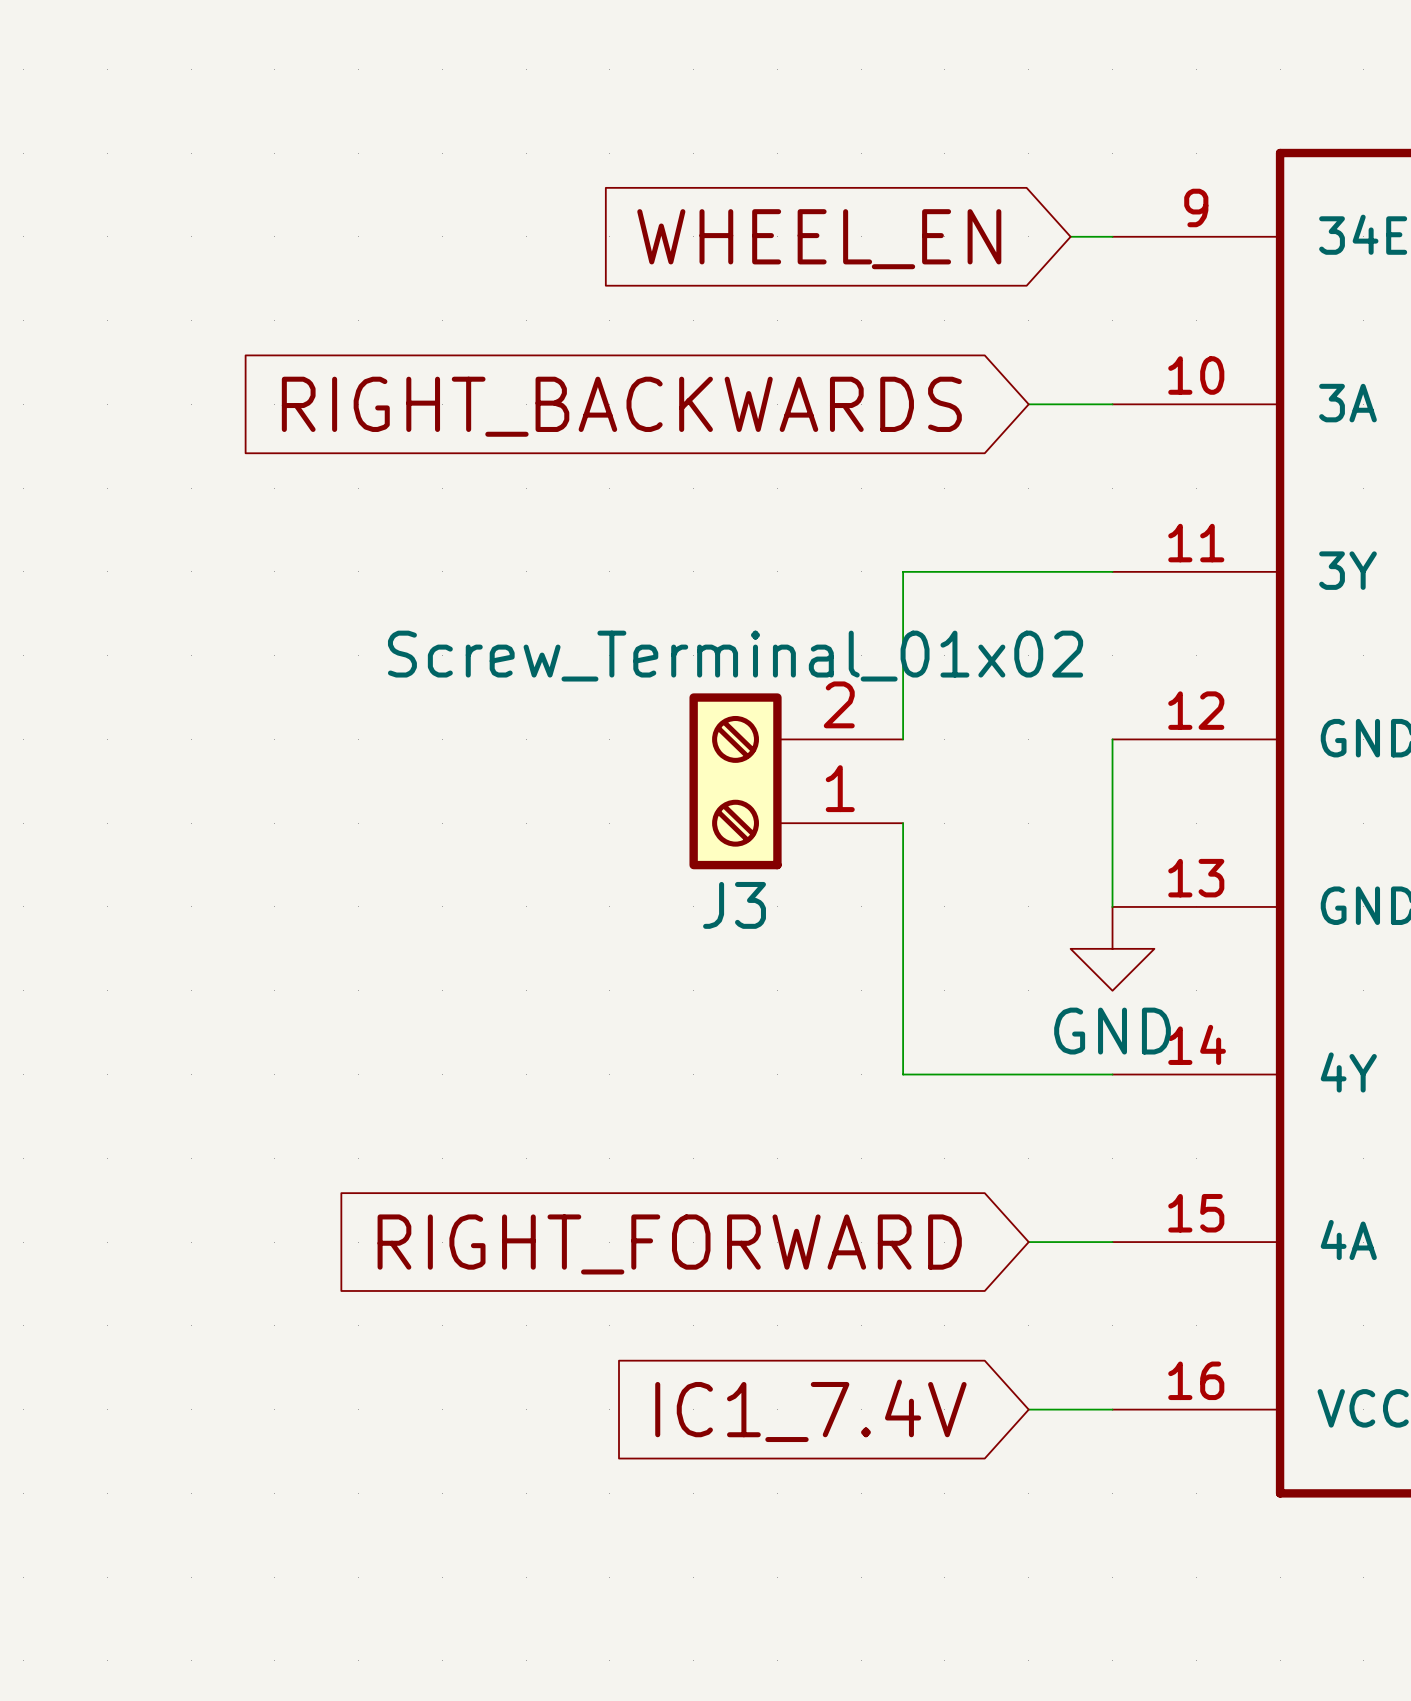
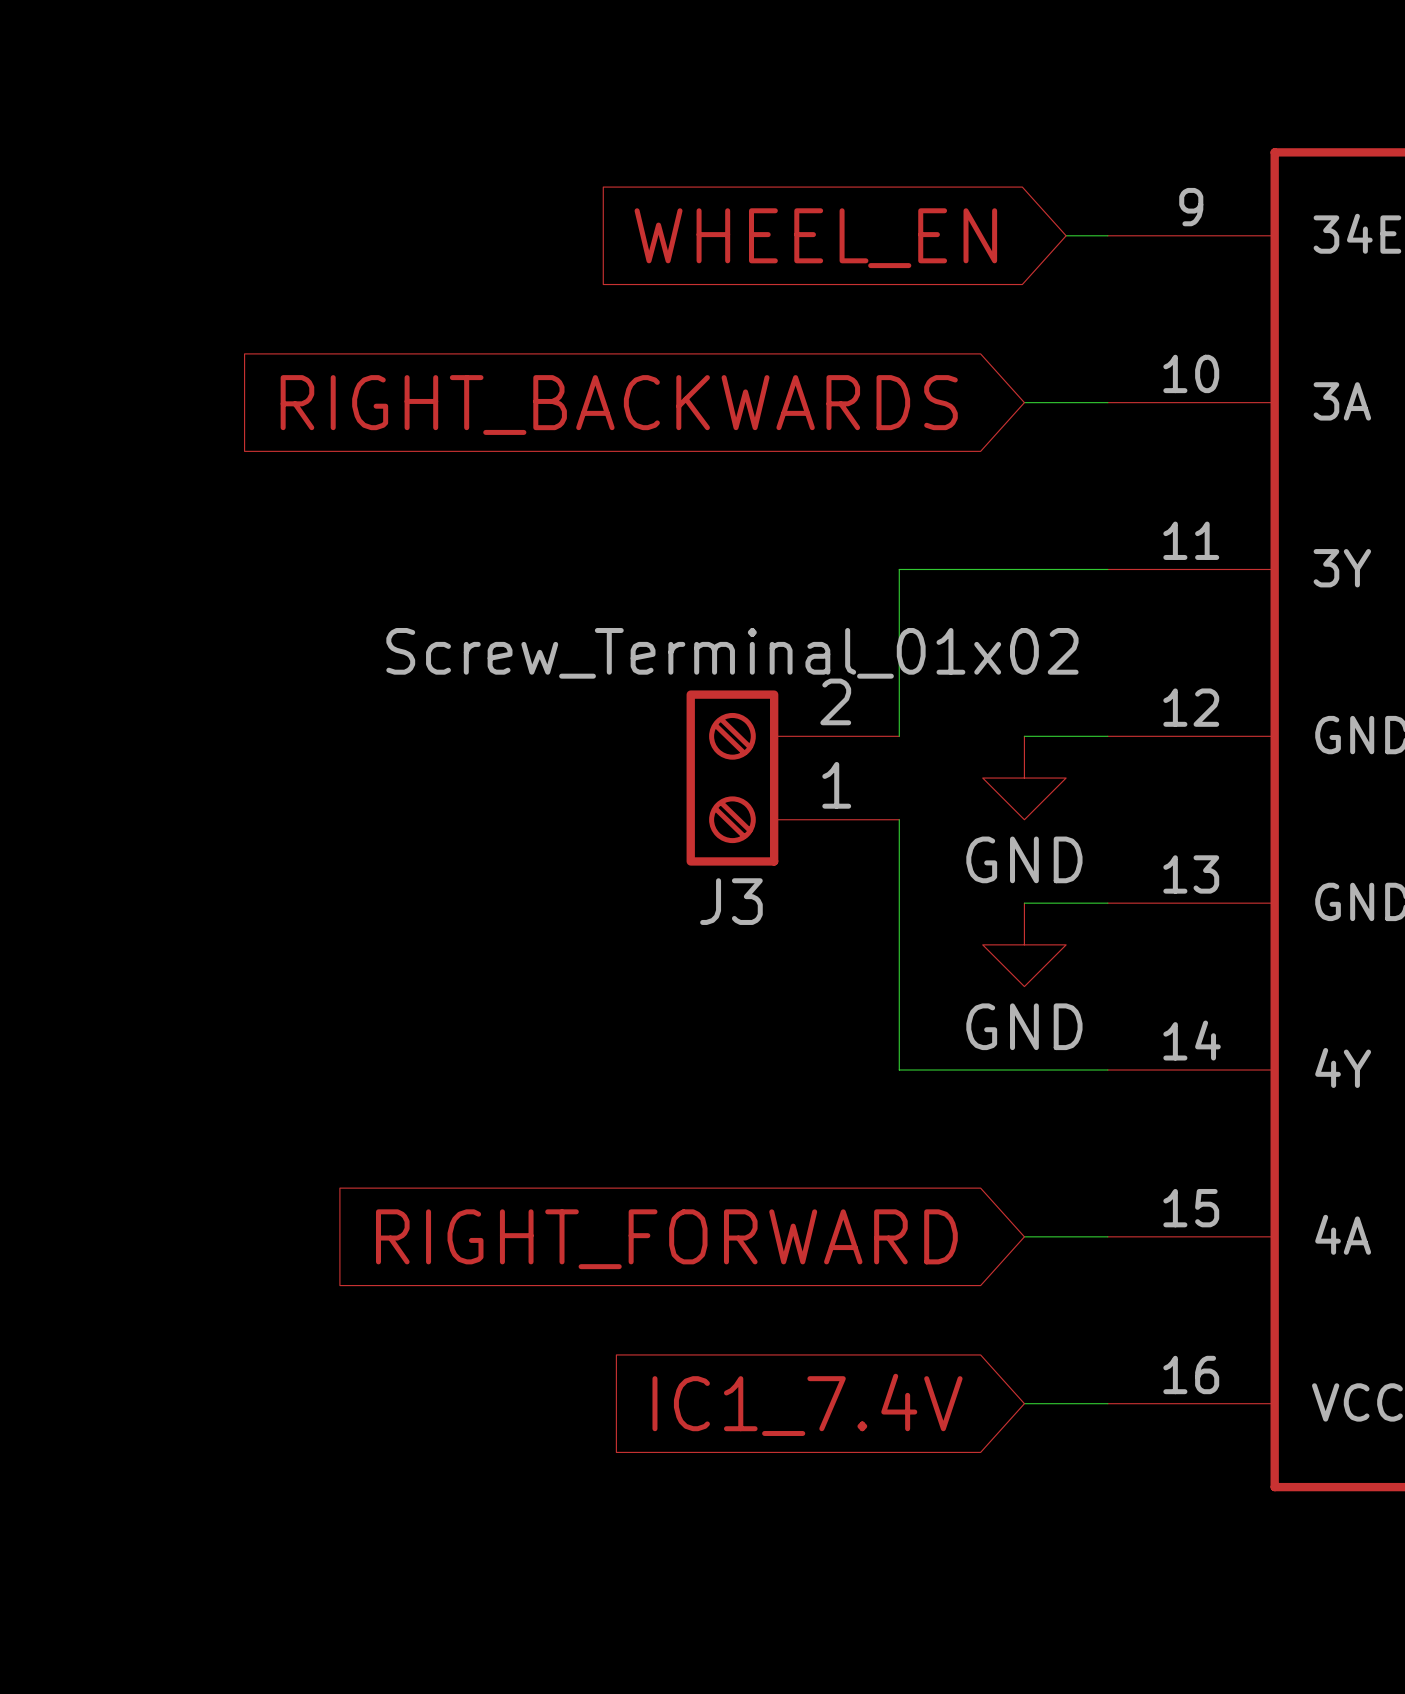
wire: (1112, 739) (1112, 906) -> (1107, 736) (1024, 736)
power symbol: none -> GND (1024, 778)
wire: none -> (1024, 903) (1107, 903)
power symbol position: GND (1112, 948) -> GND (1024, 944)

